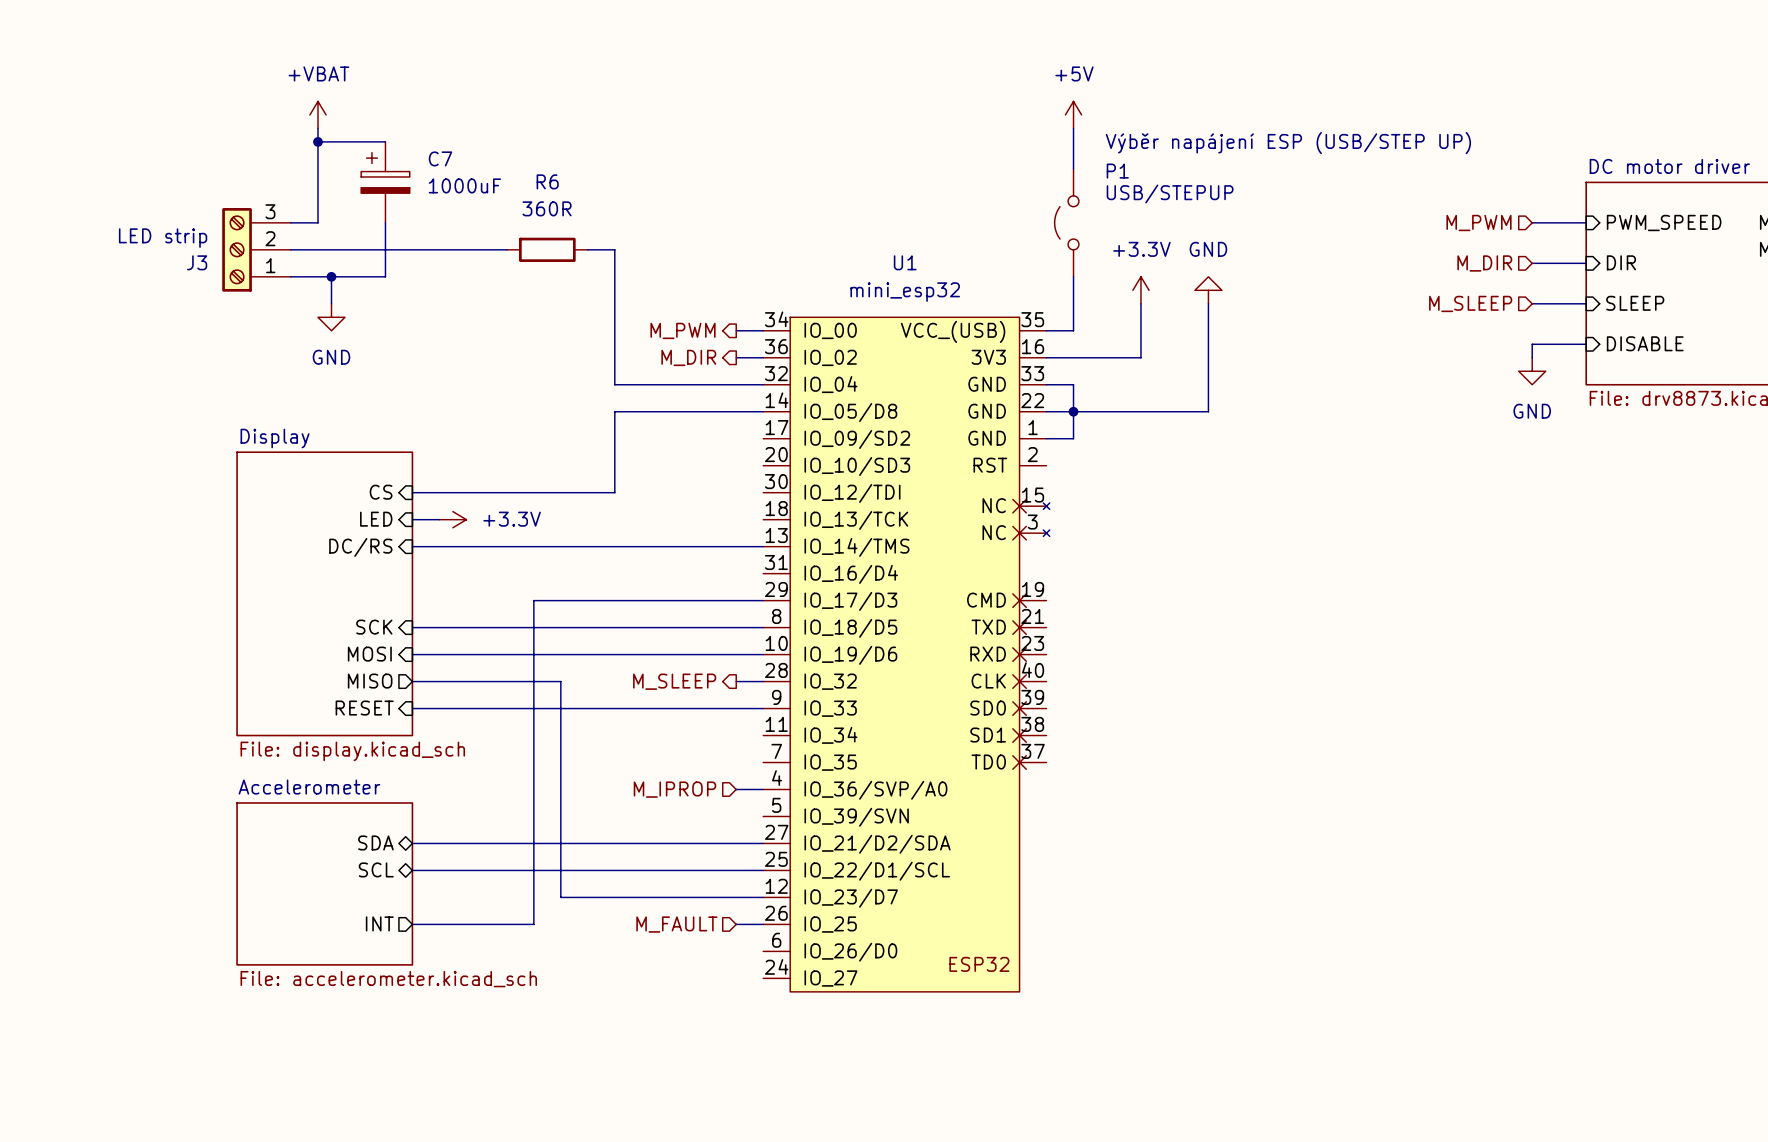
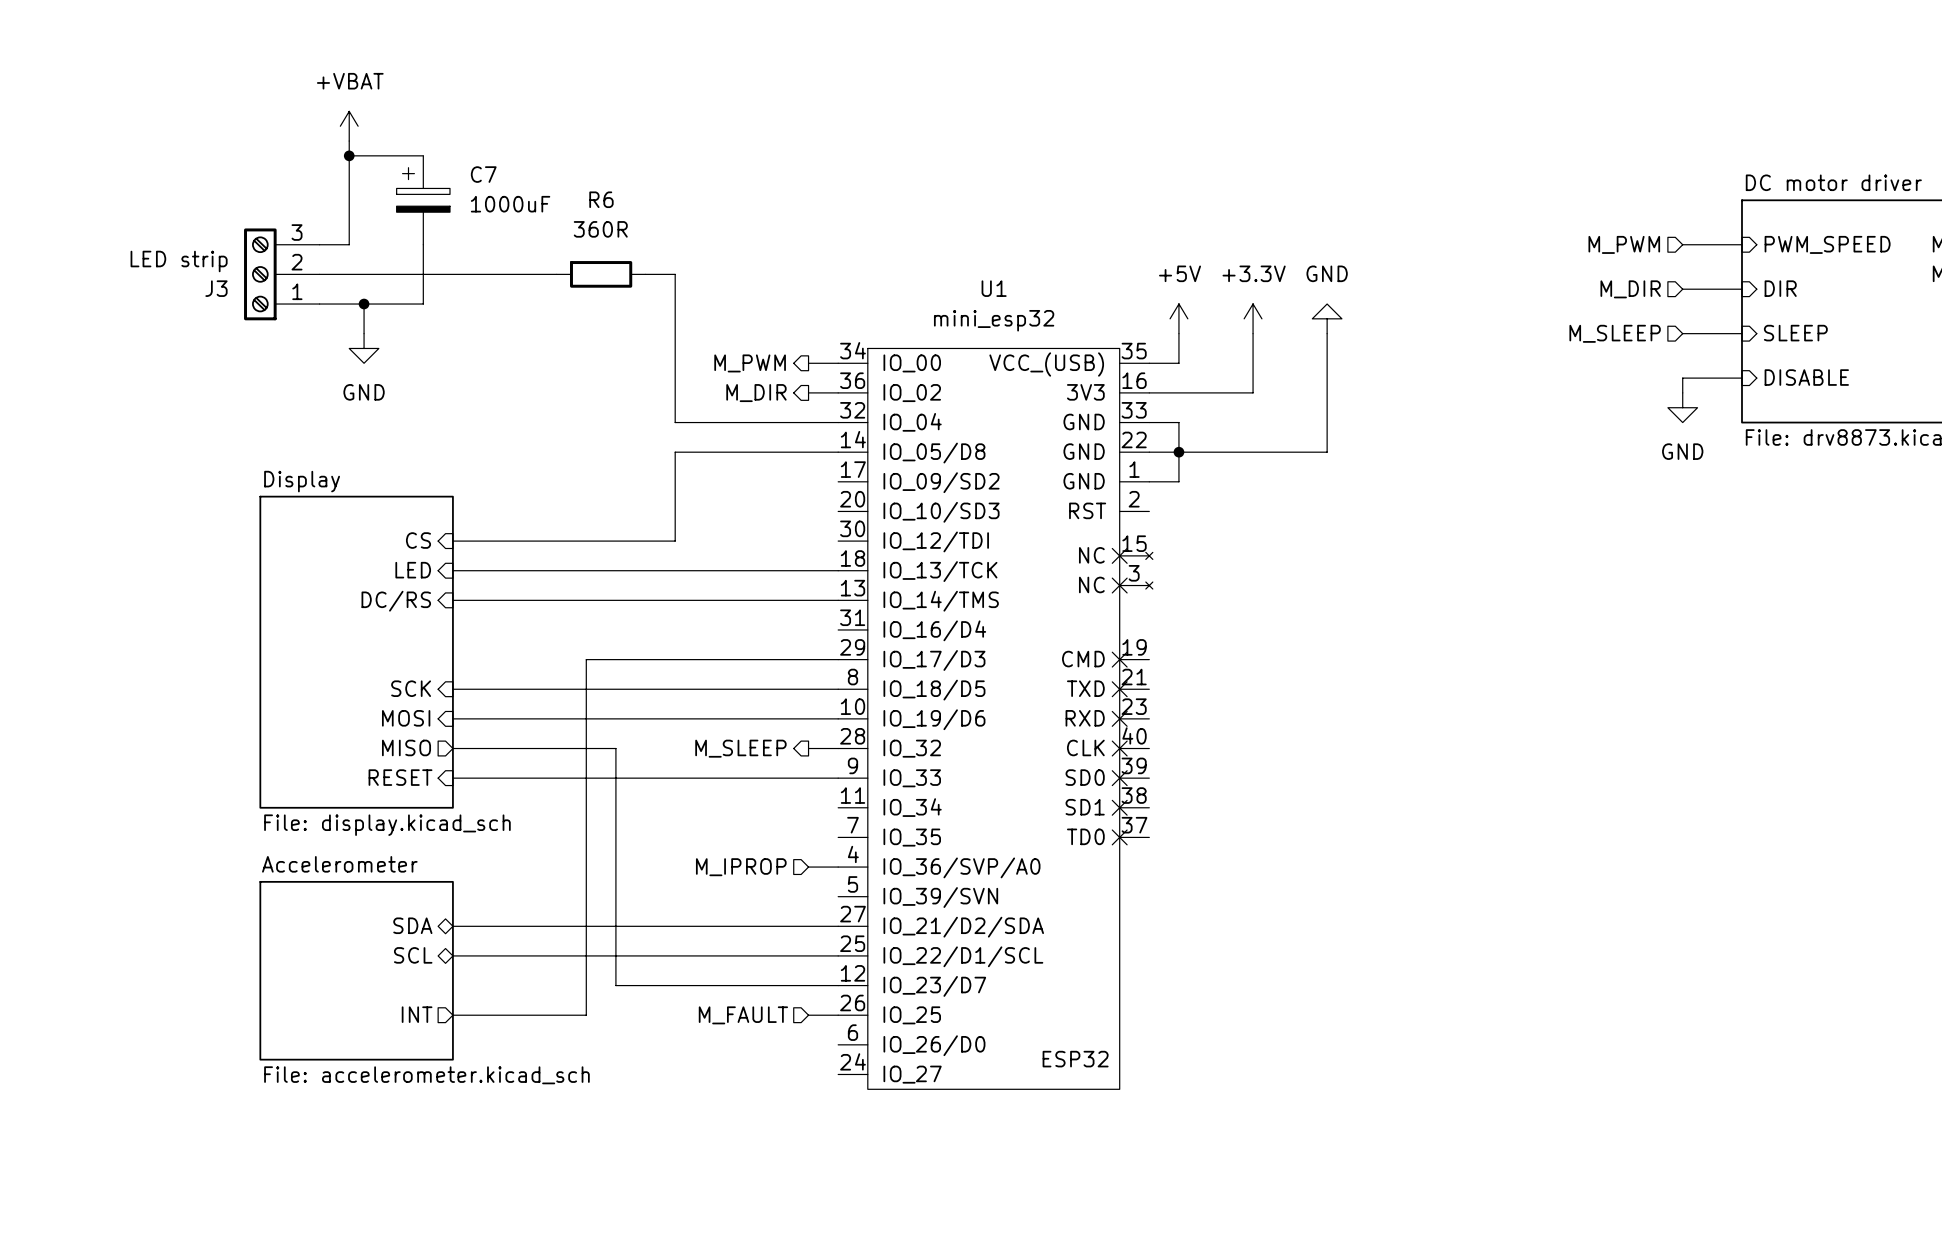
power symbol position: +5V (1073, 114) -> +5V (1178, 318)
wire: (1073, 128) (1073, 168) -> none
text: Výběr napájení ESP (USB/STEP UP) (1288, 143) -> none
P1: USB/STEPUP (1066, 222) -> none
wire: none -> (482, 570) (838, 570)
power symbol: +3.3V (452, 519) -> none

